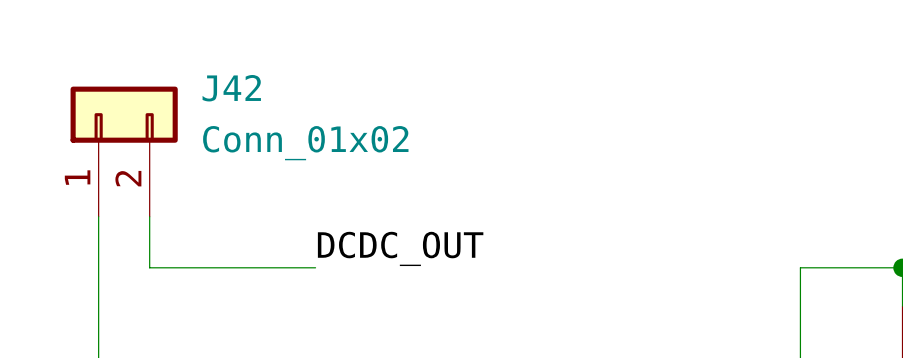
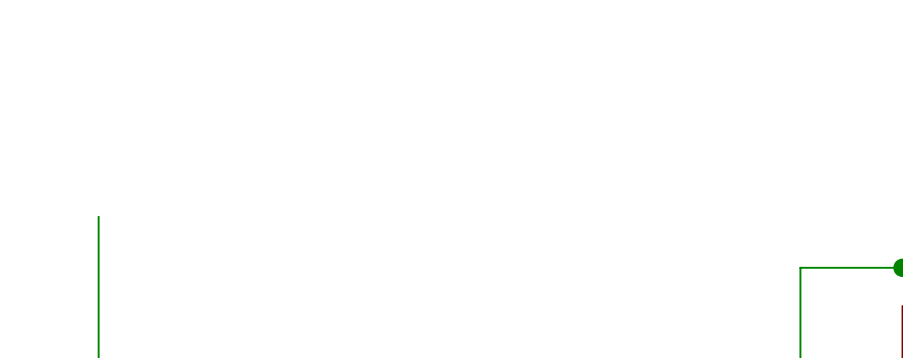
J42: Conn_01x02 (124, 151) -> none
wire: (149, 216) (149, 267) (315, 267) -> none
label: DCDC_OUT (400, 248) -> none
wire: (902, 267) (902, 306) -> none

